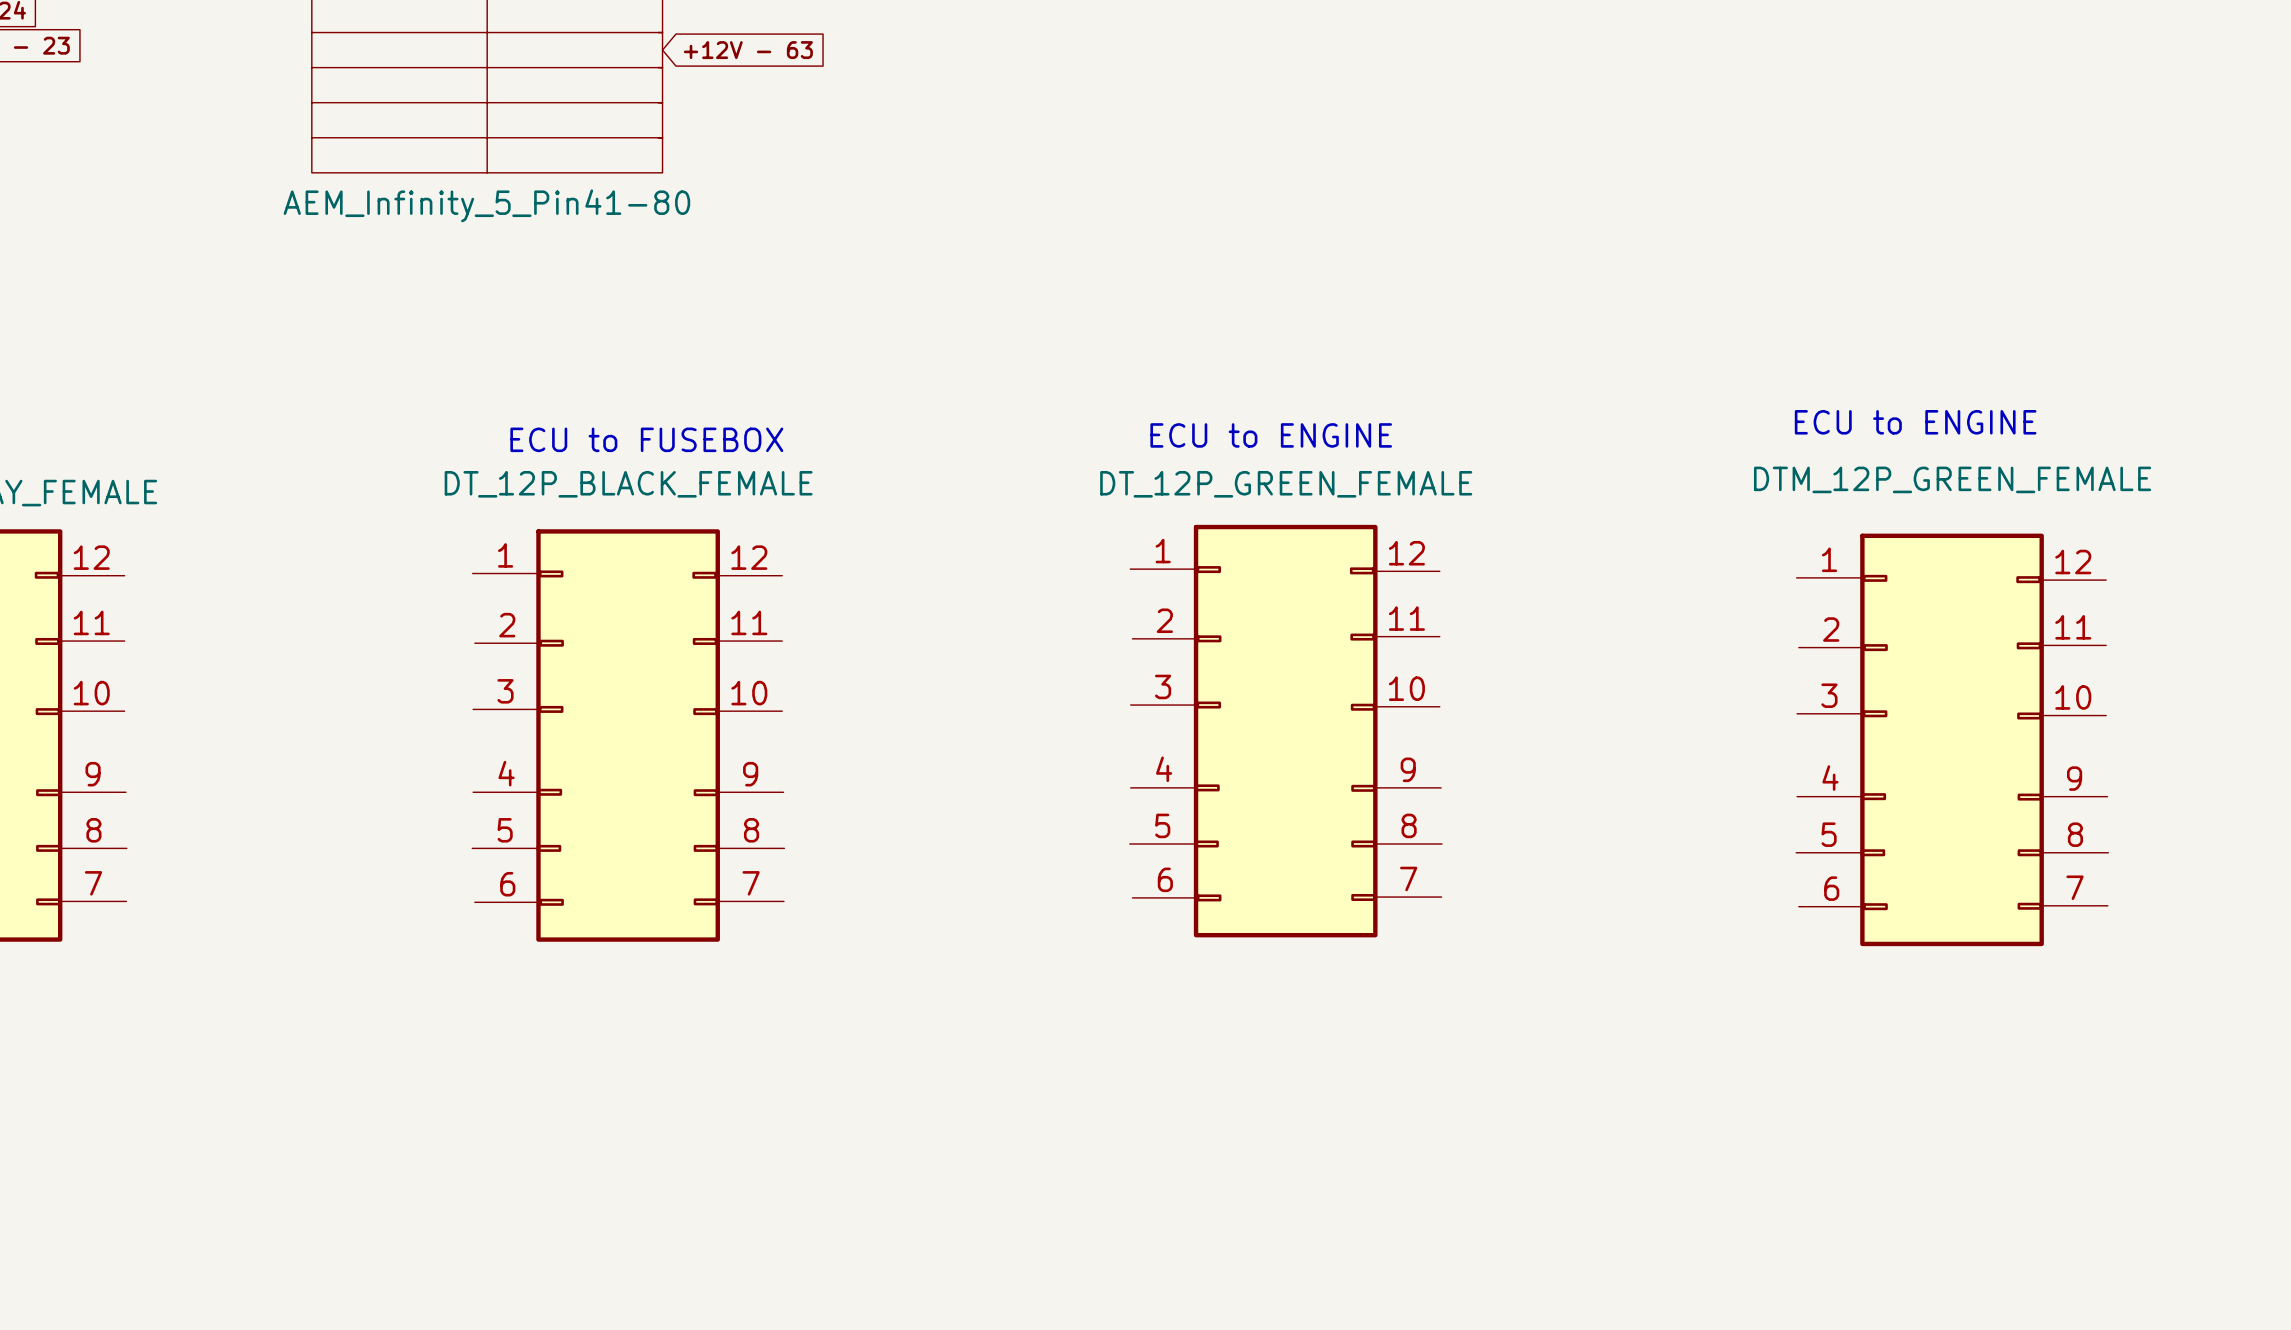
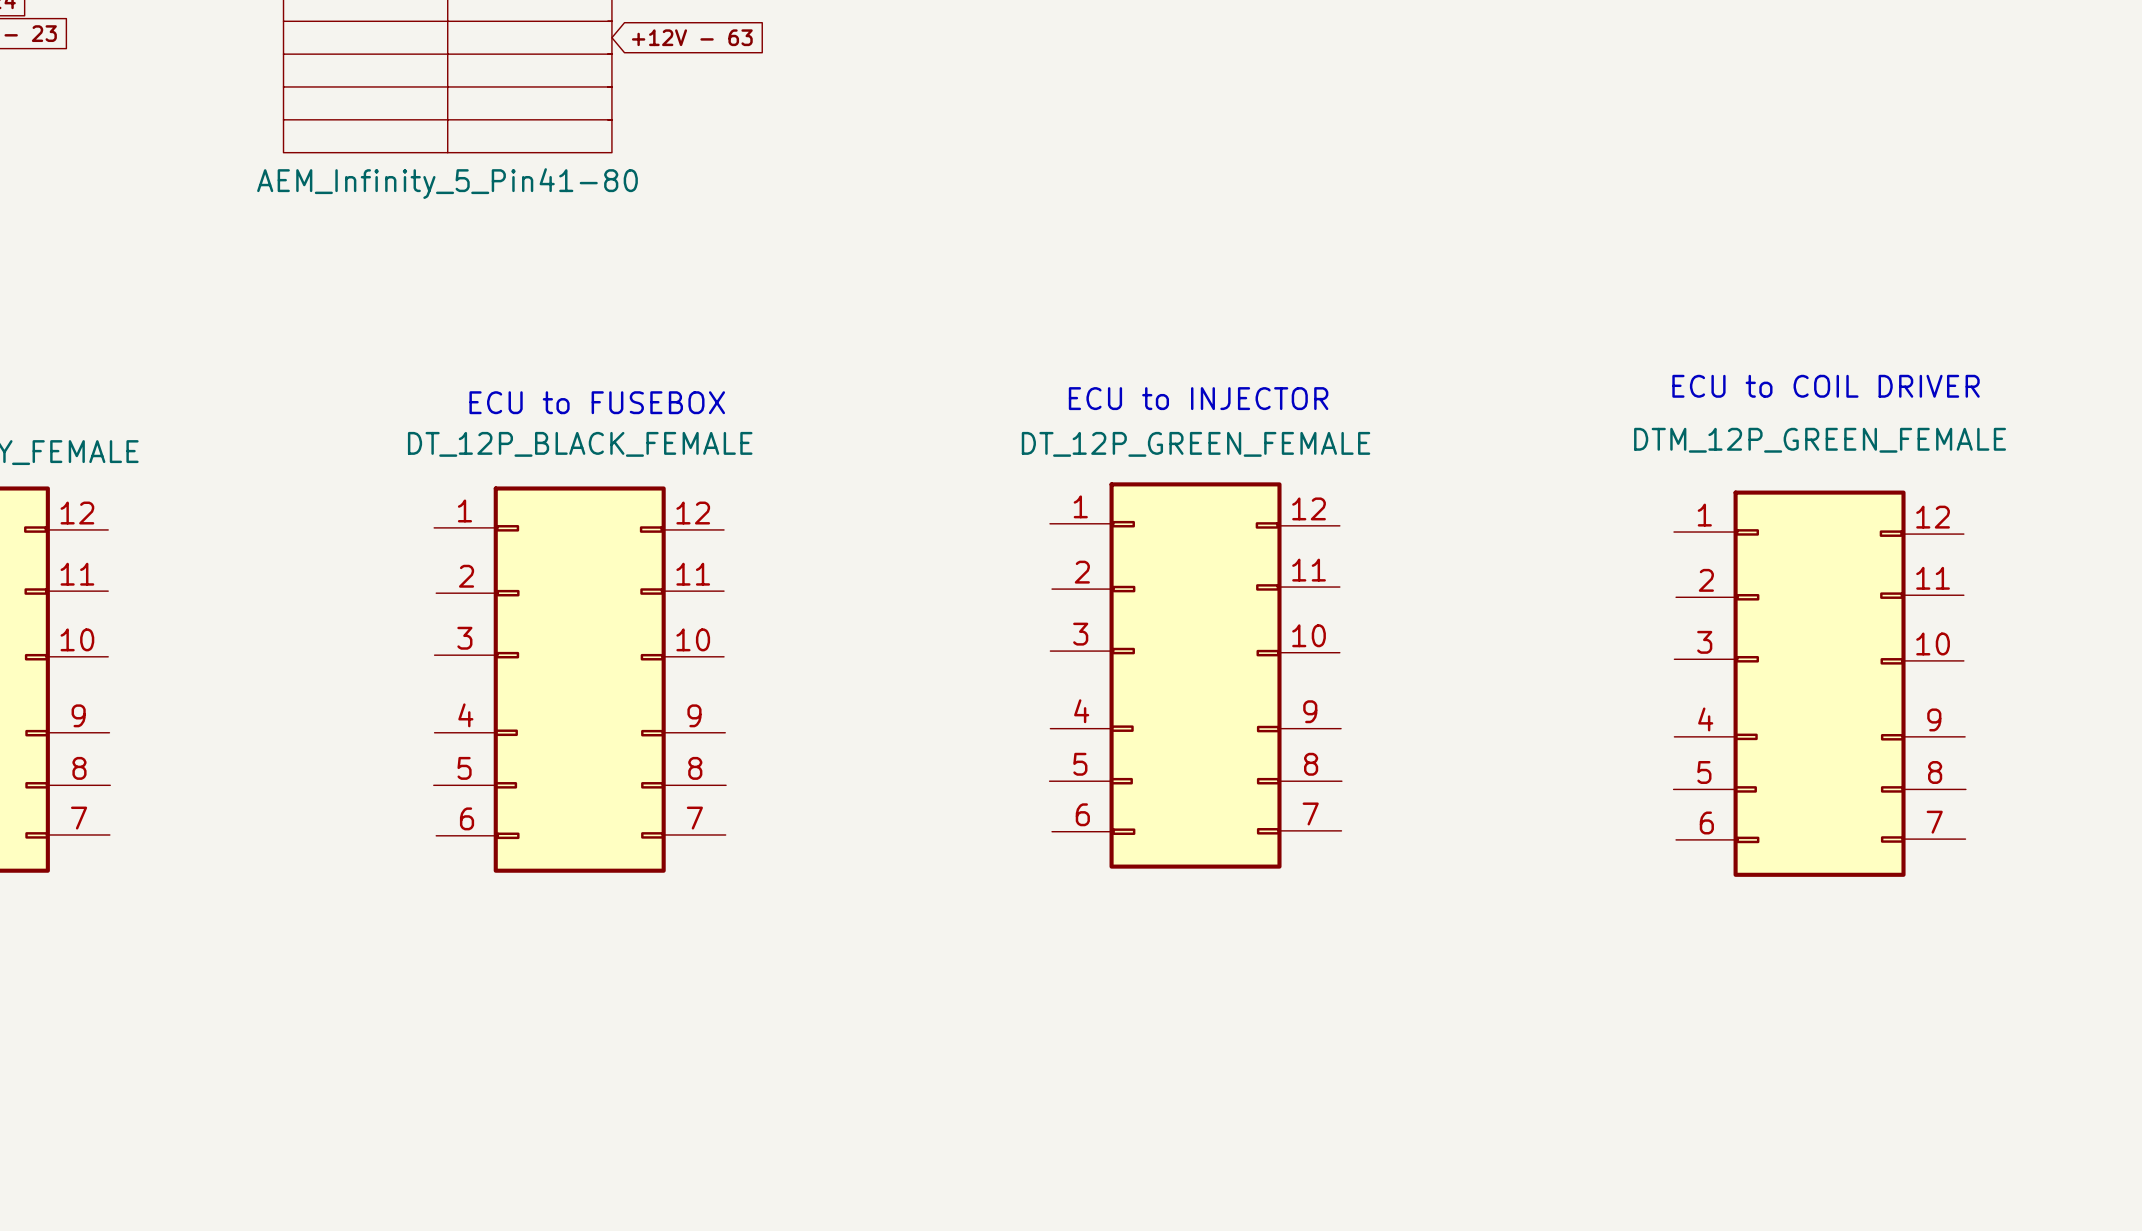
text: ECU to ENGINE (1915, 422) -> ECU to COIL DRIVER (1826, 386)
text: ECU to ENGINE (1271, 435) -> ECU to INJECTOR (1198, 398)

